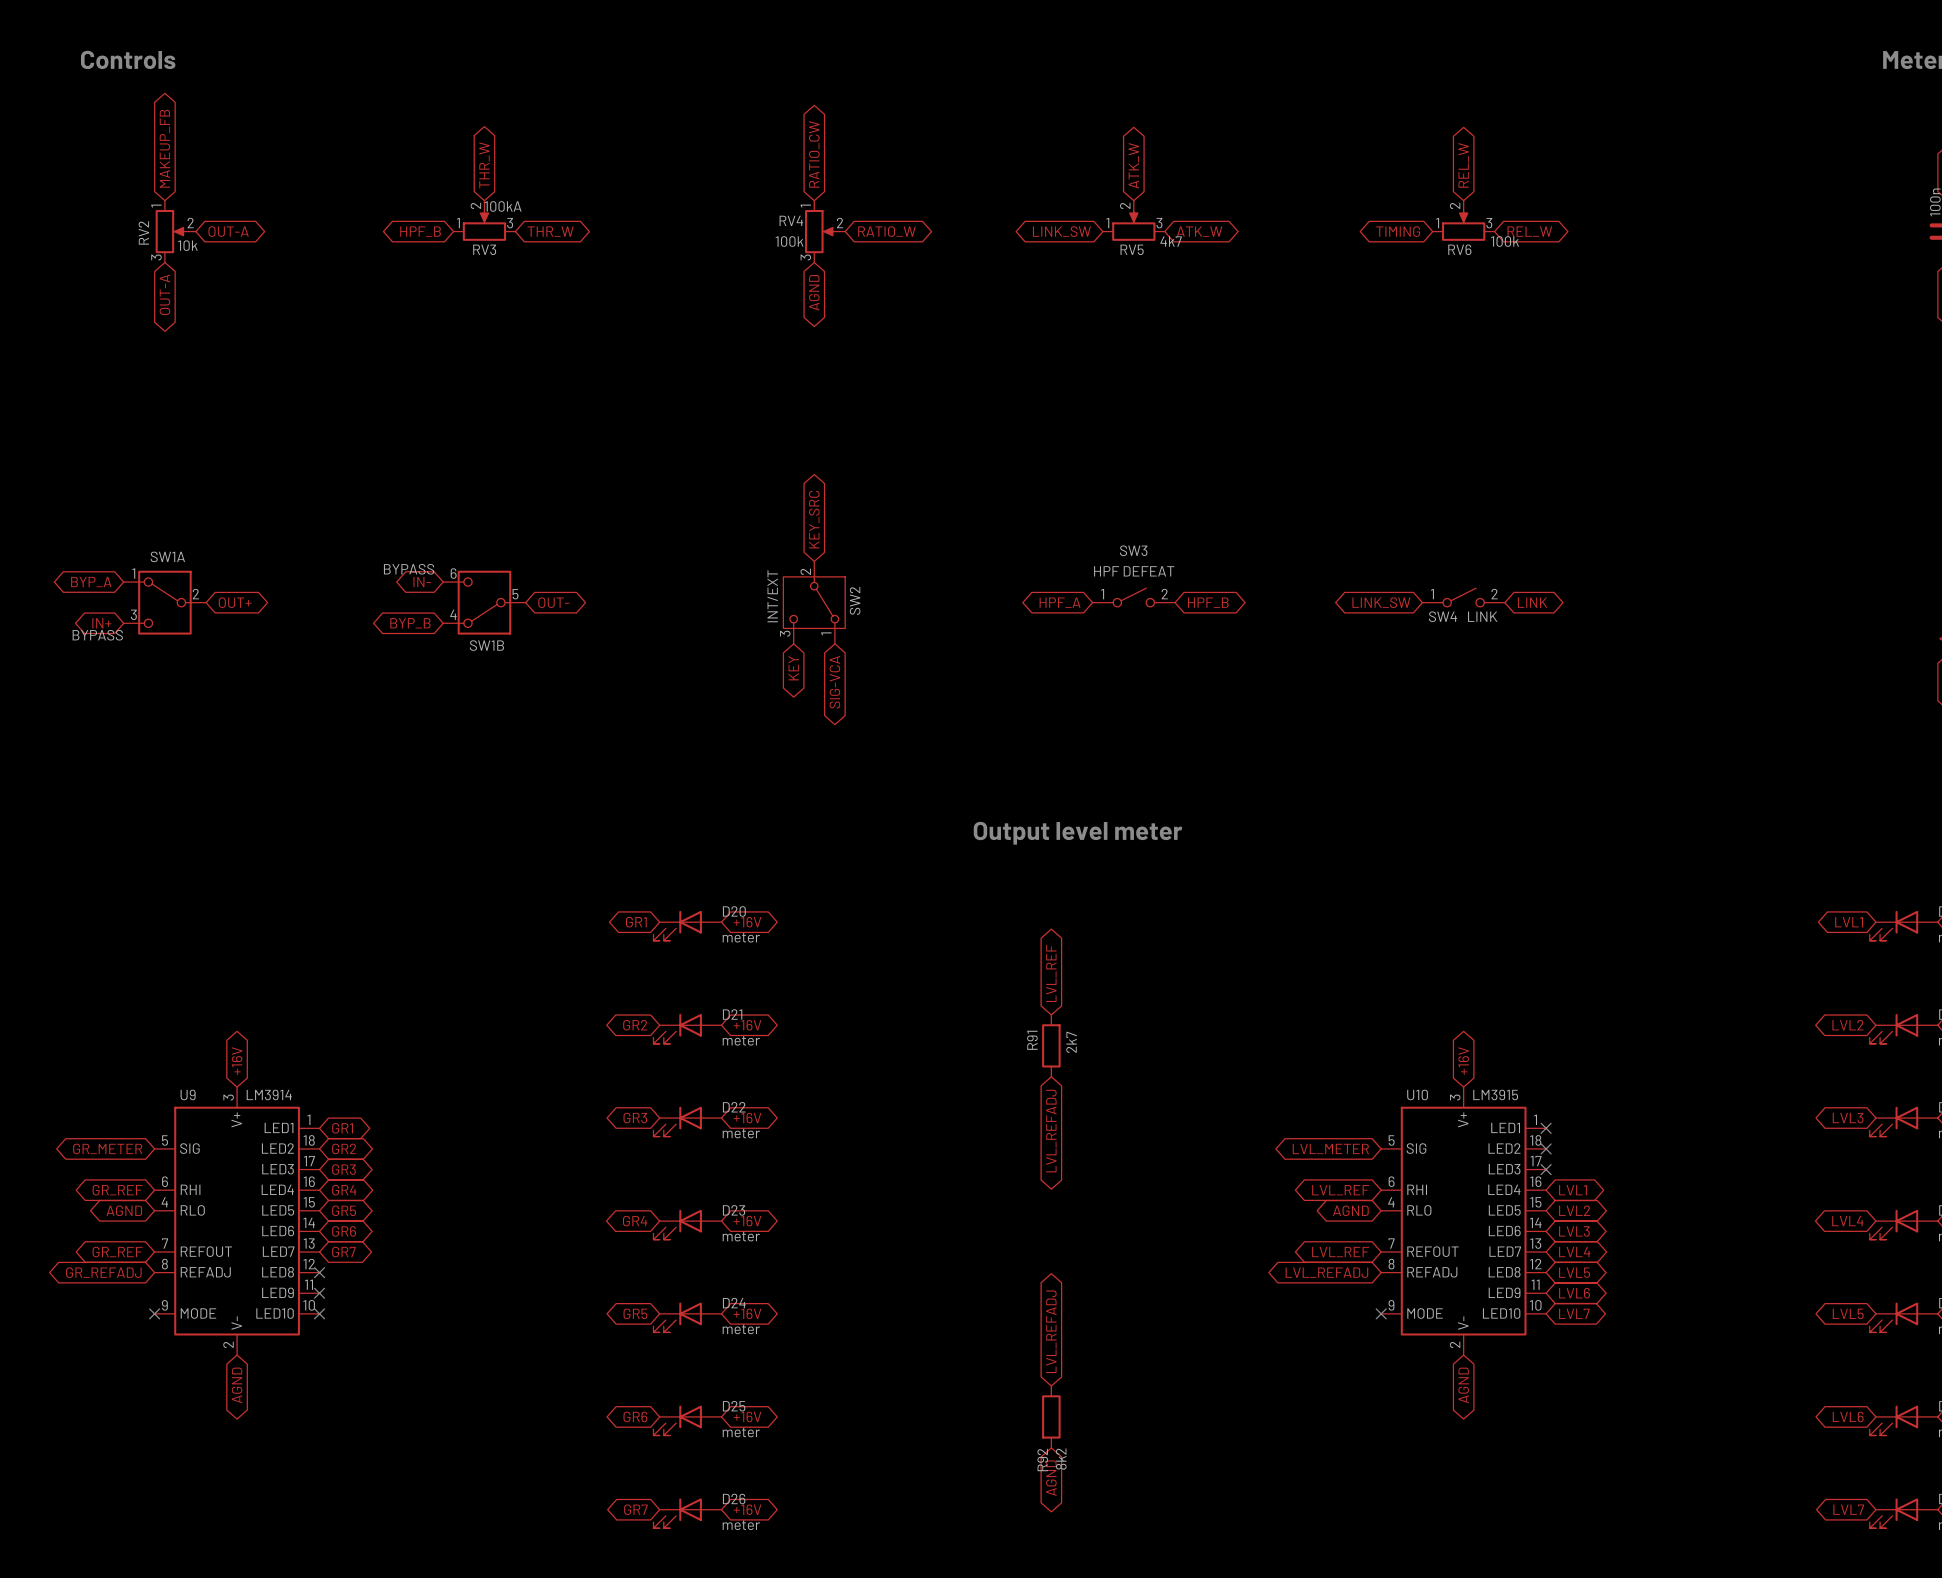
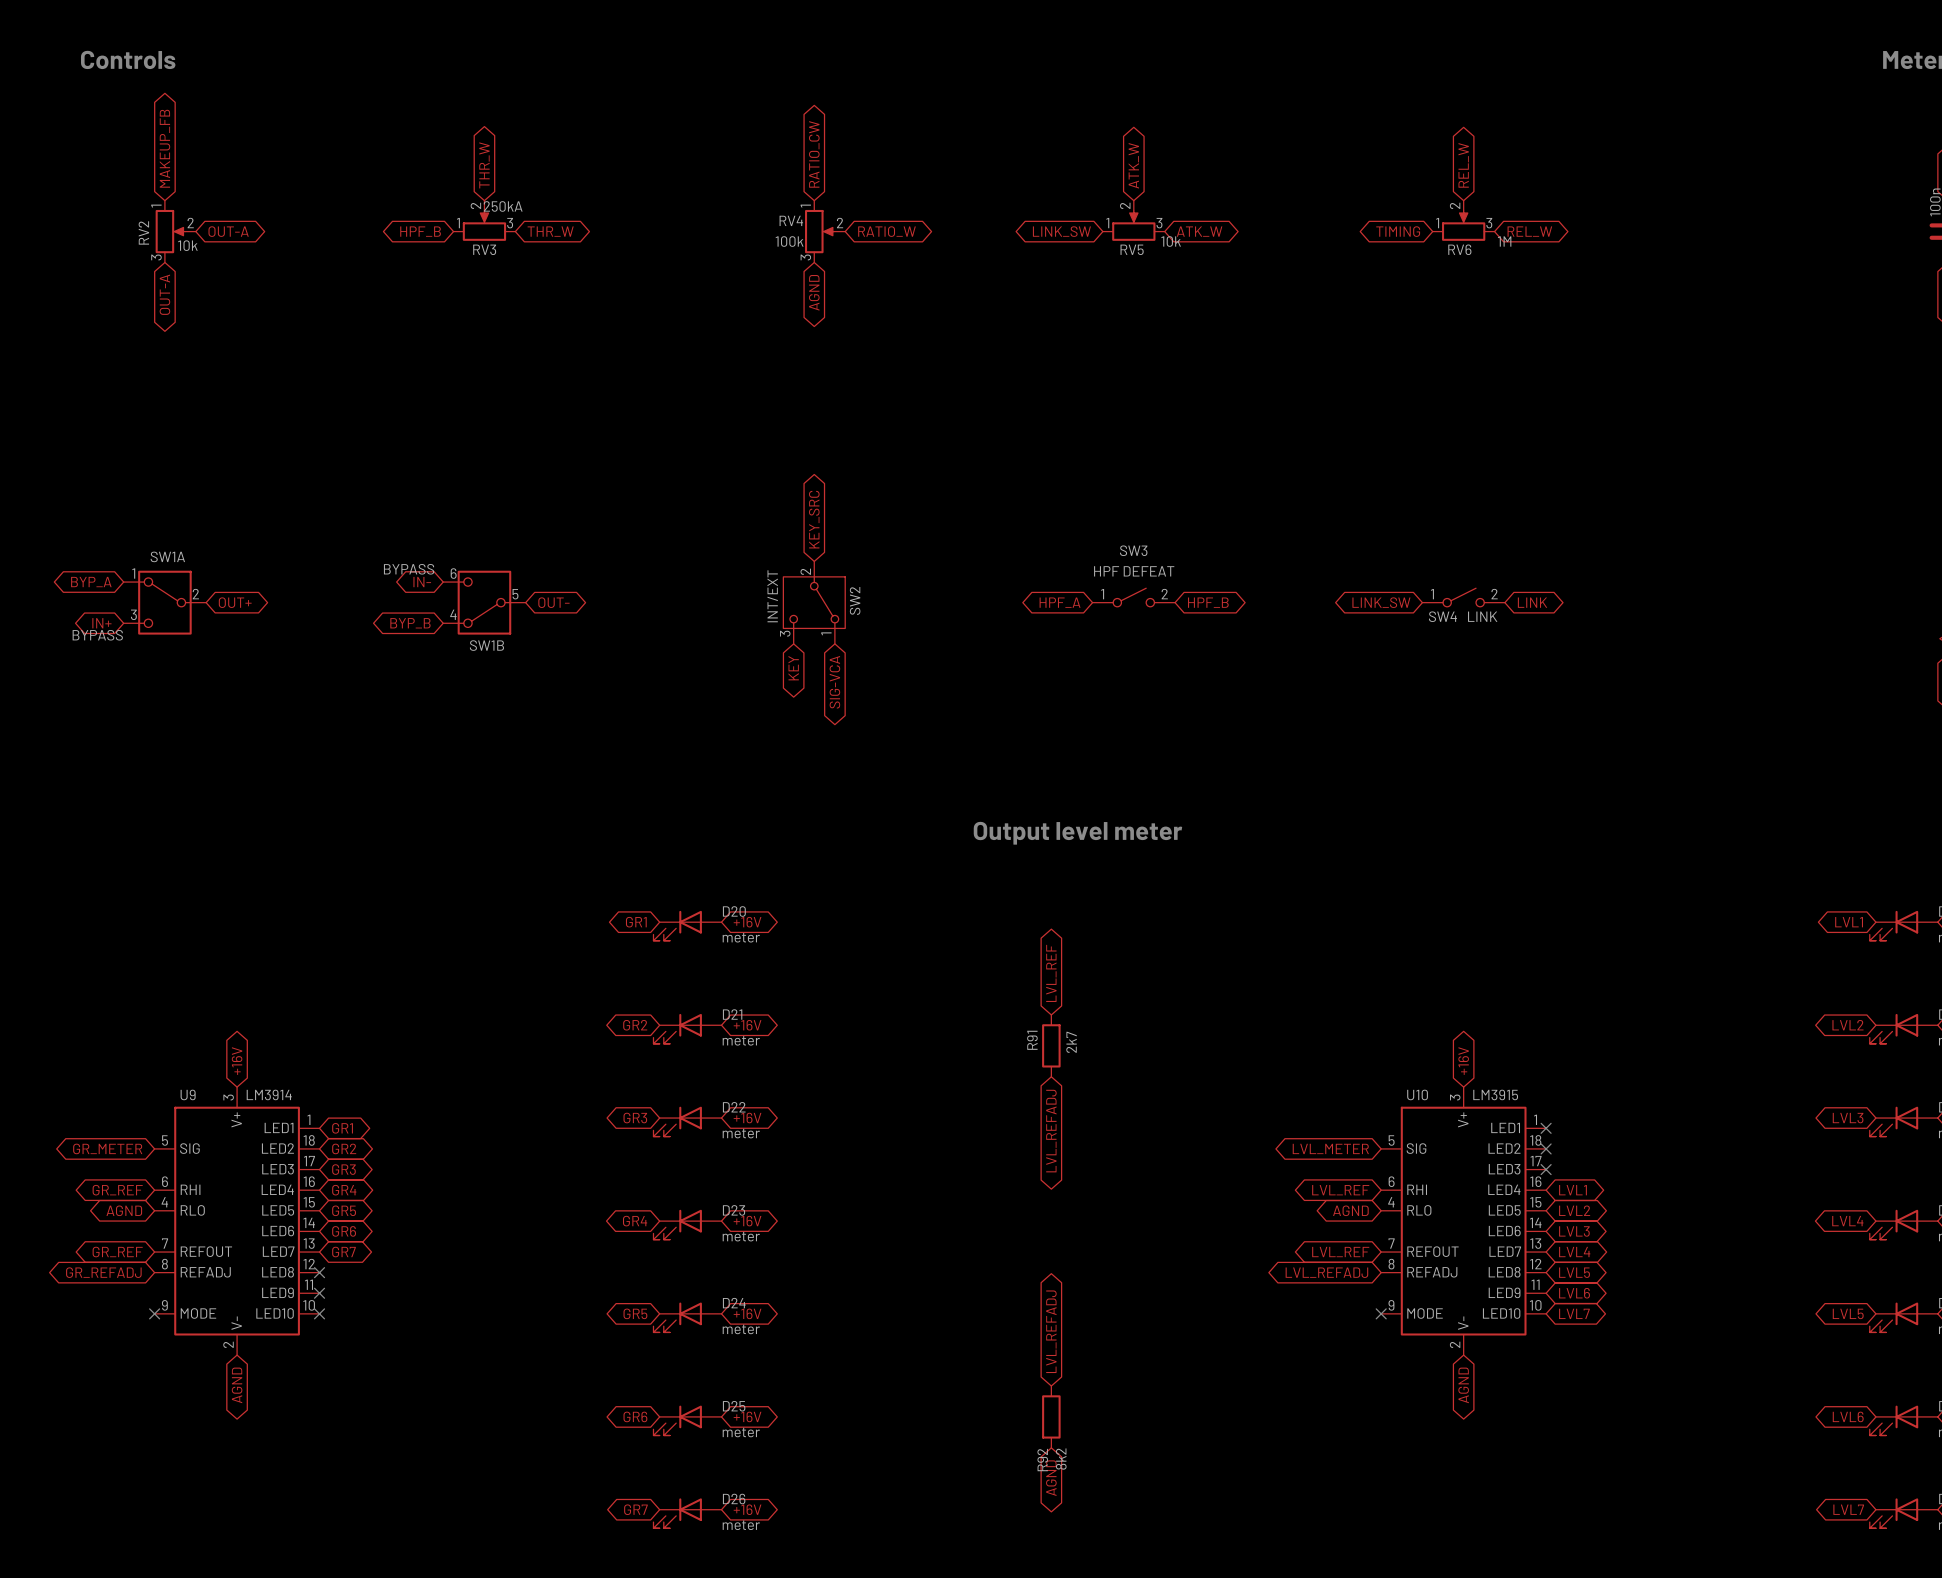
RV3 value: 100kA (503, 206) -> 250kA (503, 206)
RV5 value: 4k7 (1171, 241) -> 10k (1171, 241)
RV6 value: 100k (1505, 241) -> 1M (1504, 241)

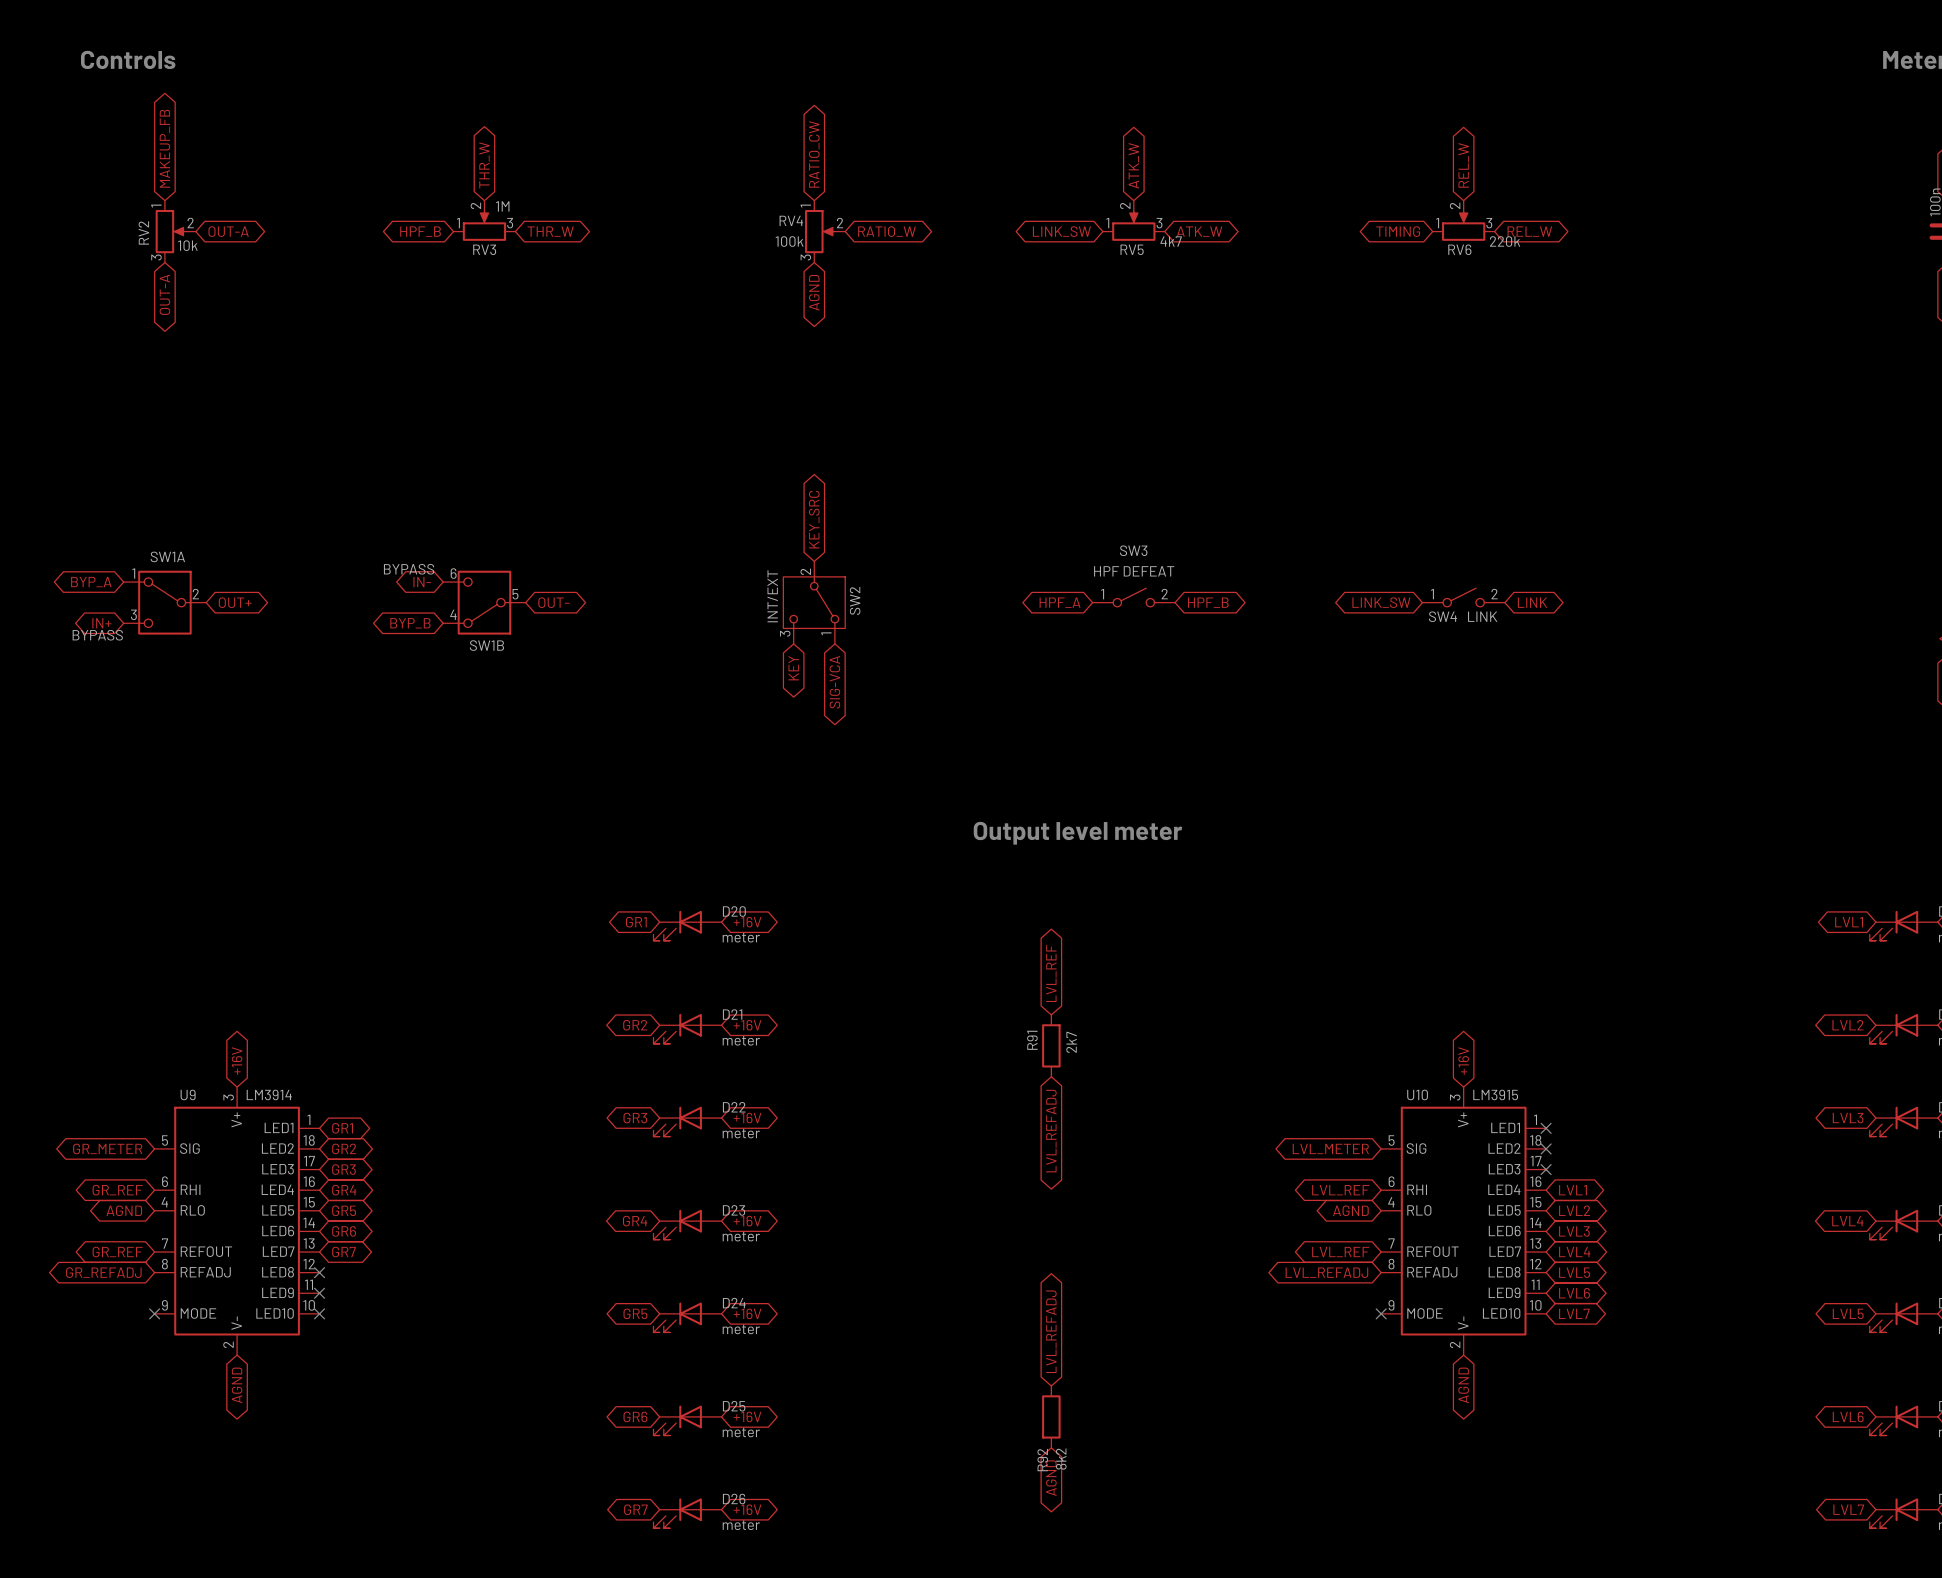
RV3 value: 250kA (503, 206) -> 1M (502, 206)
RV5 value: 10k (1171, 241) -> 4k7 (1171, 241)
RV6 value: 1M (1504, 241) -> 220k (1505, 241)

